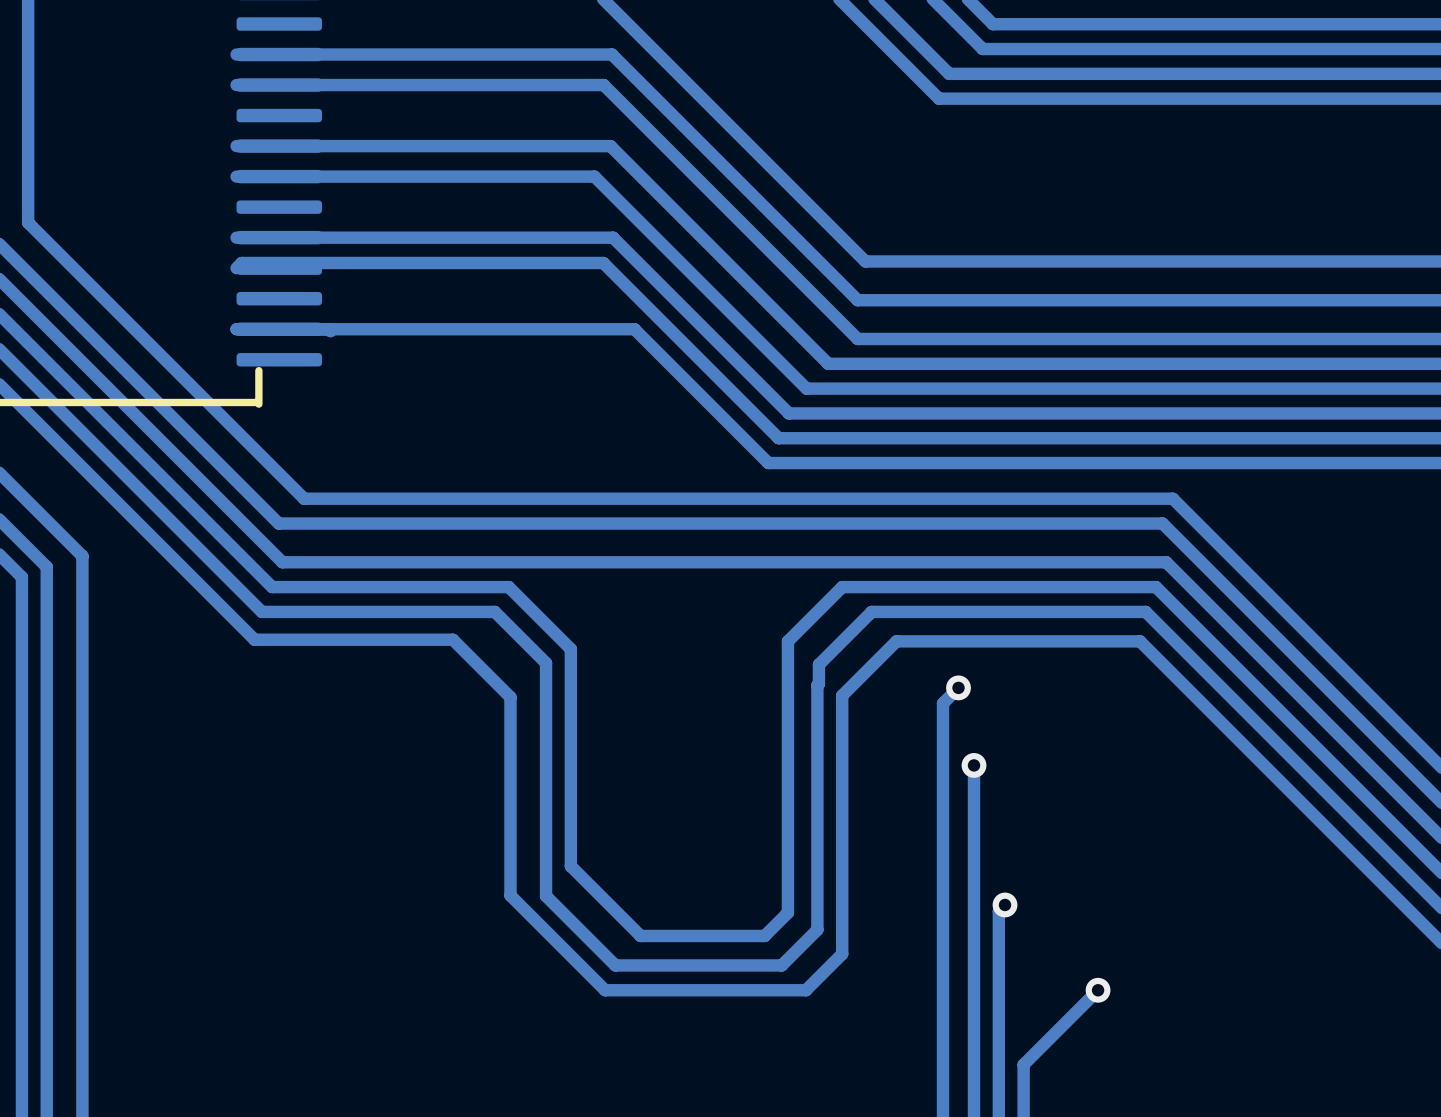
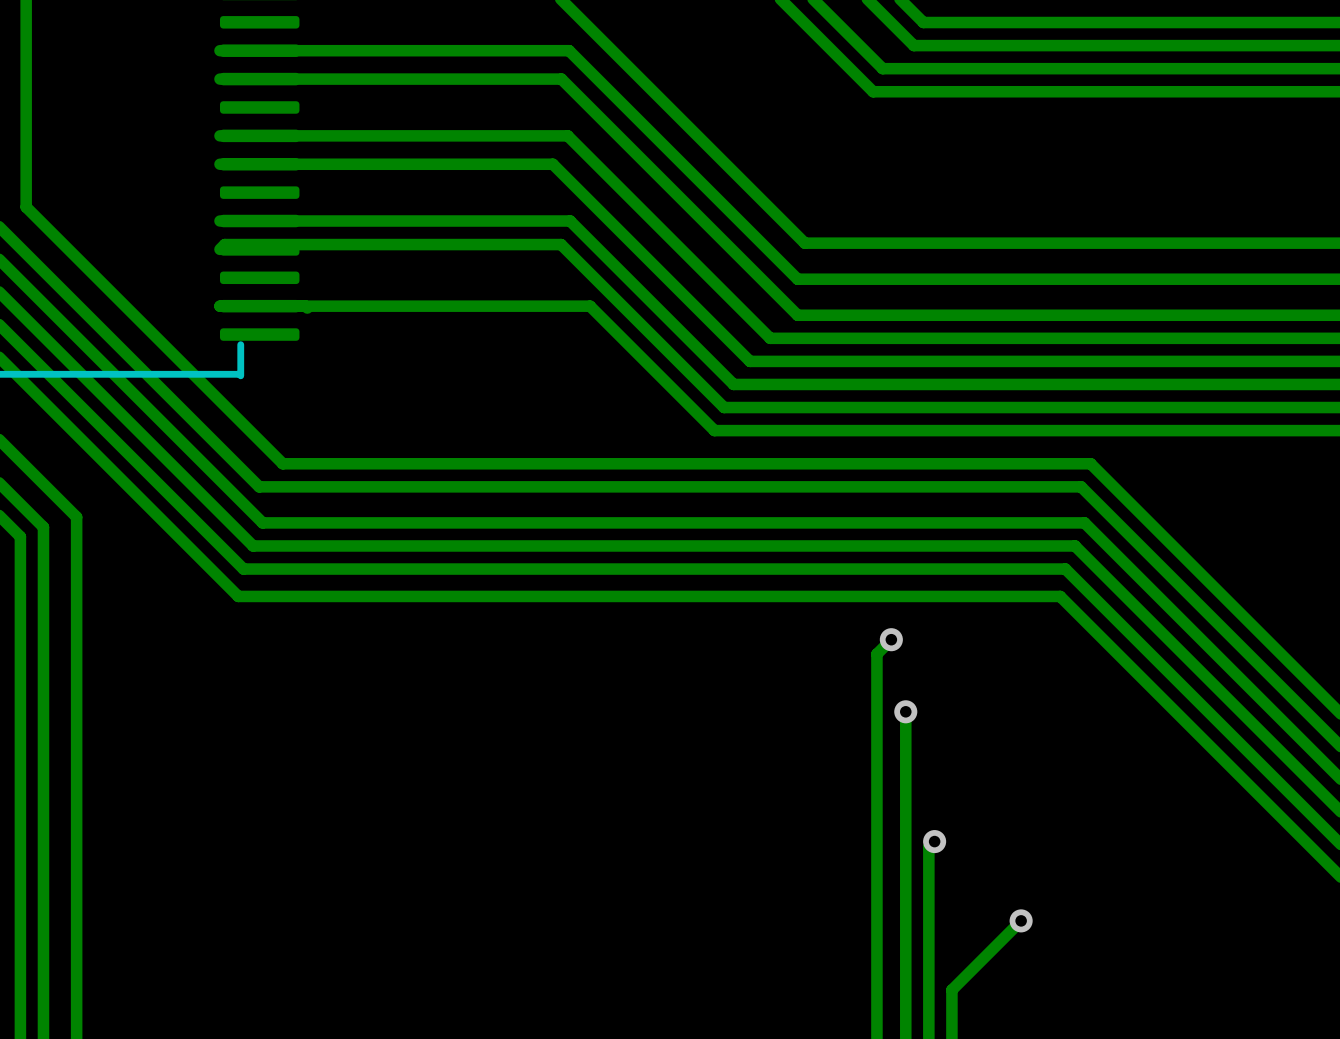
track: (842, 587) (787, 641) (787, 912) (764, 935) (640, 935) (570, 866) (570, 649) (508, 587) -> (783, 545) (473, 545)
track: (871, 611) (818, 664) (817, 929) (781, 965) (615, 965) (546, 896) (546, 663) (494, 611) -> (810, 569) (460, 569)
track: (254, 639) (452, 639) (510, 697) (510, 895) (605, 990) (805, 990) (842, 954) (842, 695) (896, 641) -> (236, 594) (238, 596) (833, 596)

